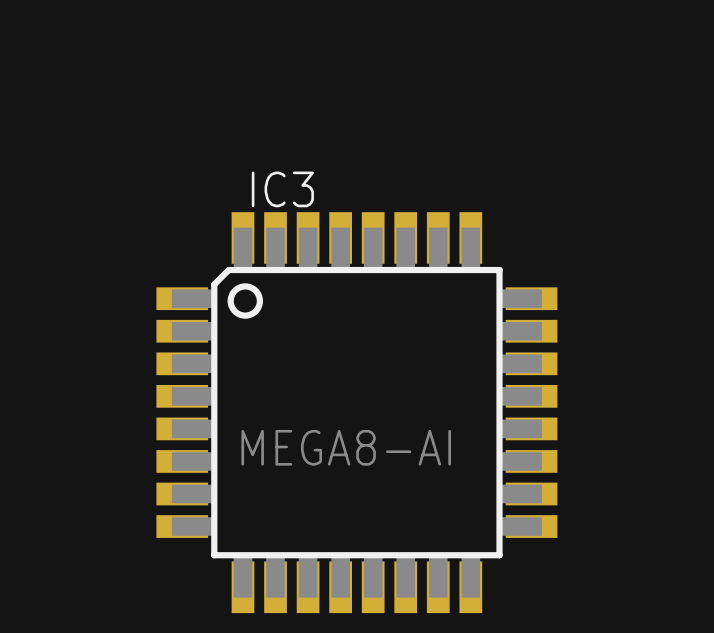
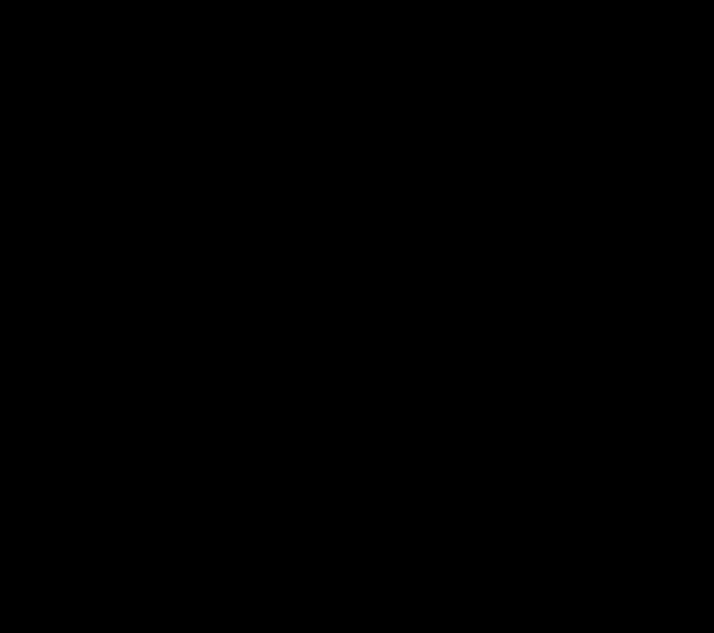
IC3: MEGA8-AI (356, 412) -> none

